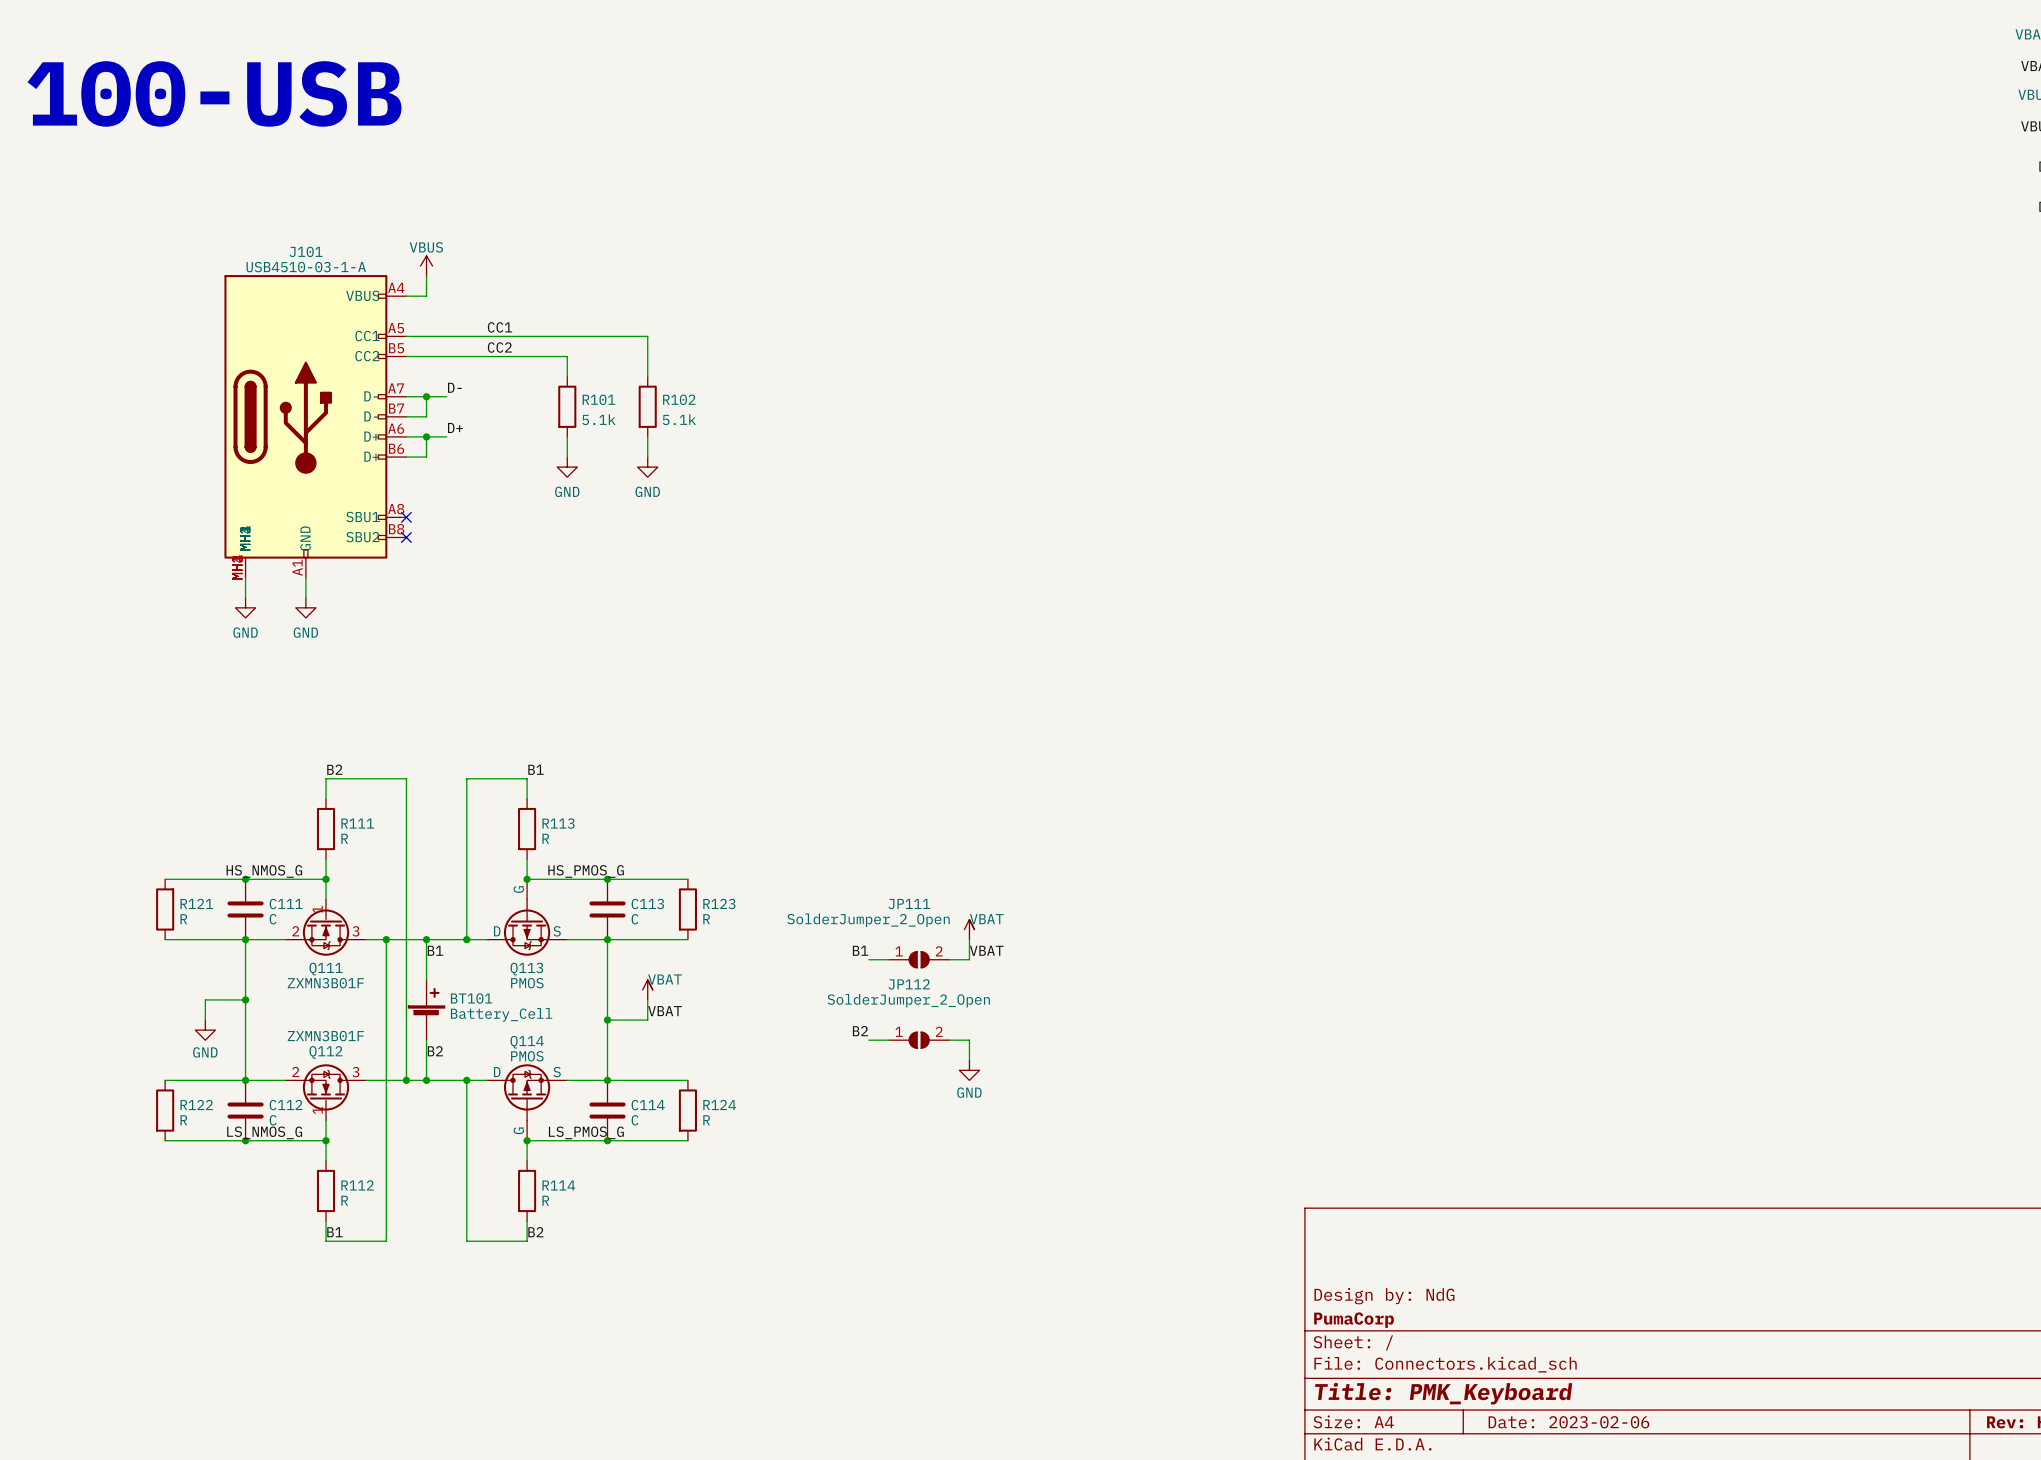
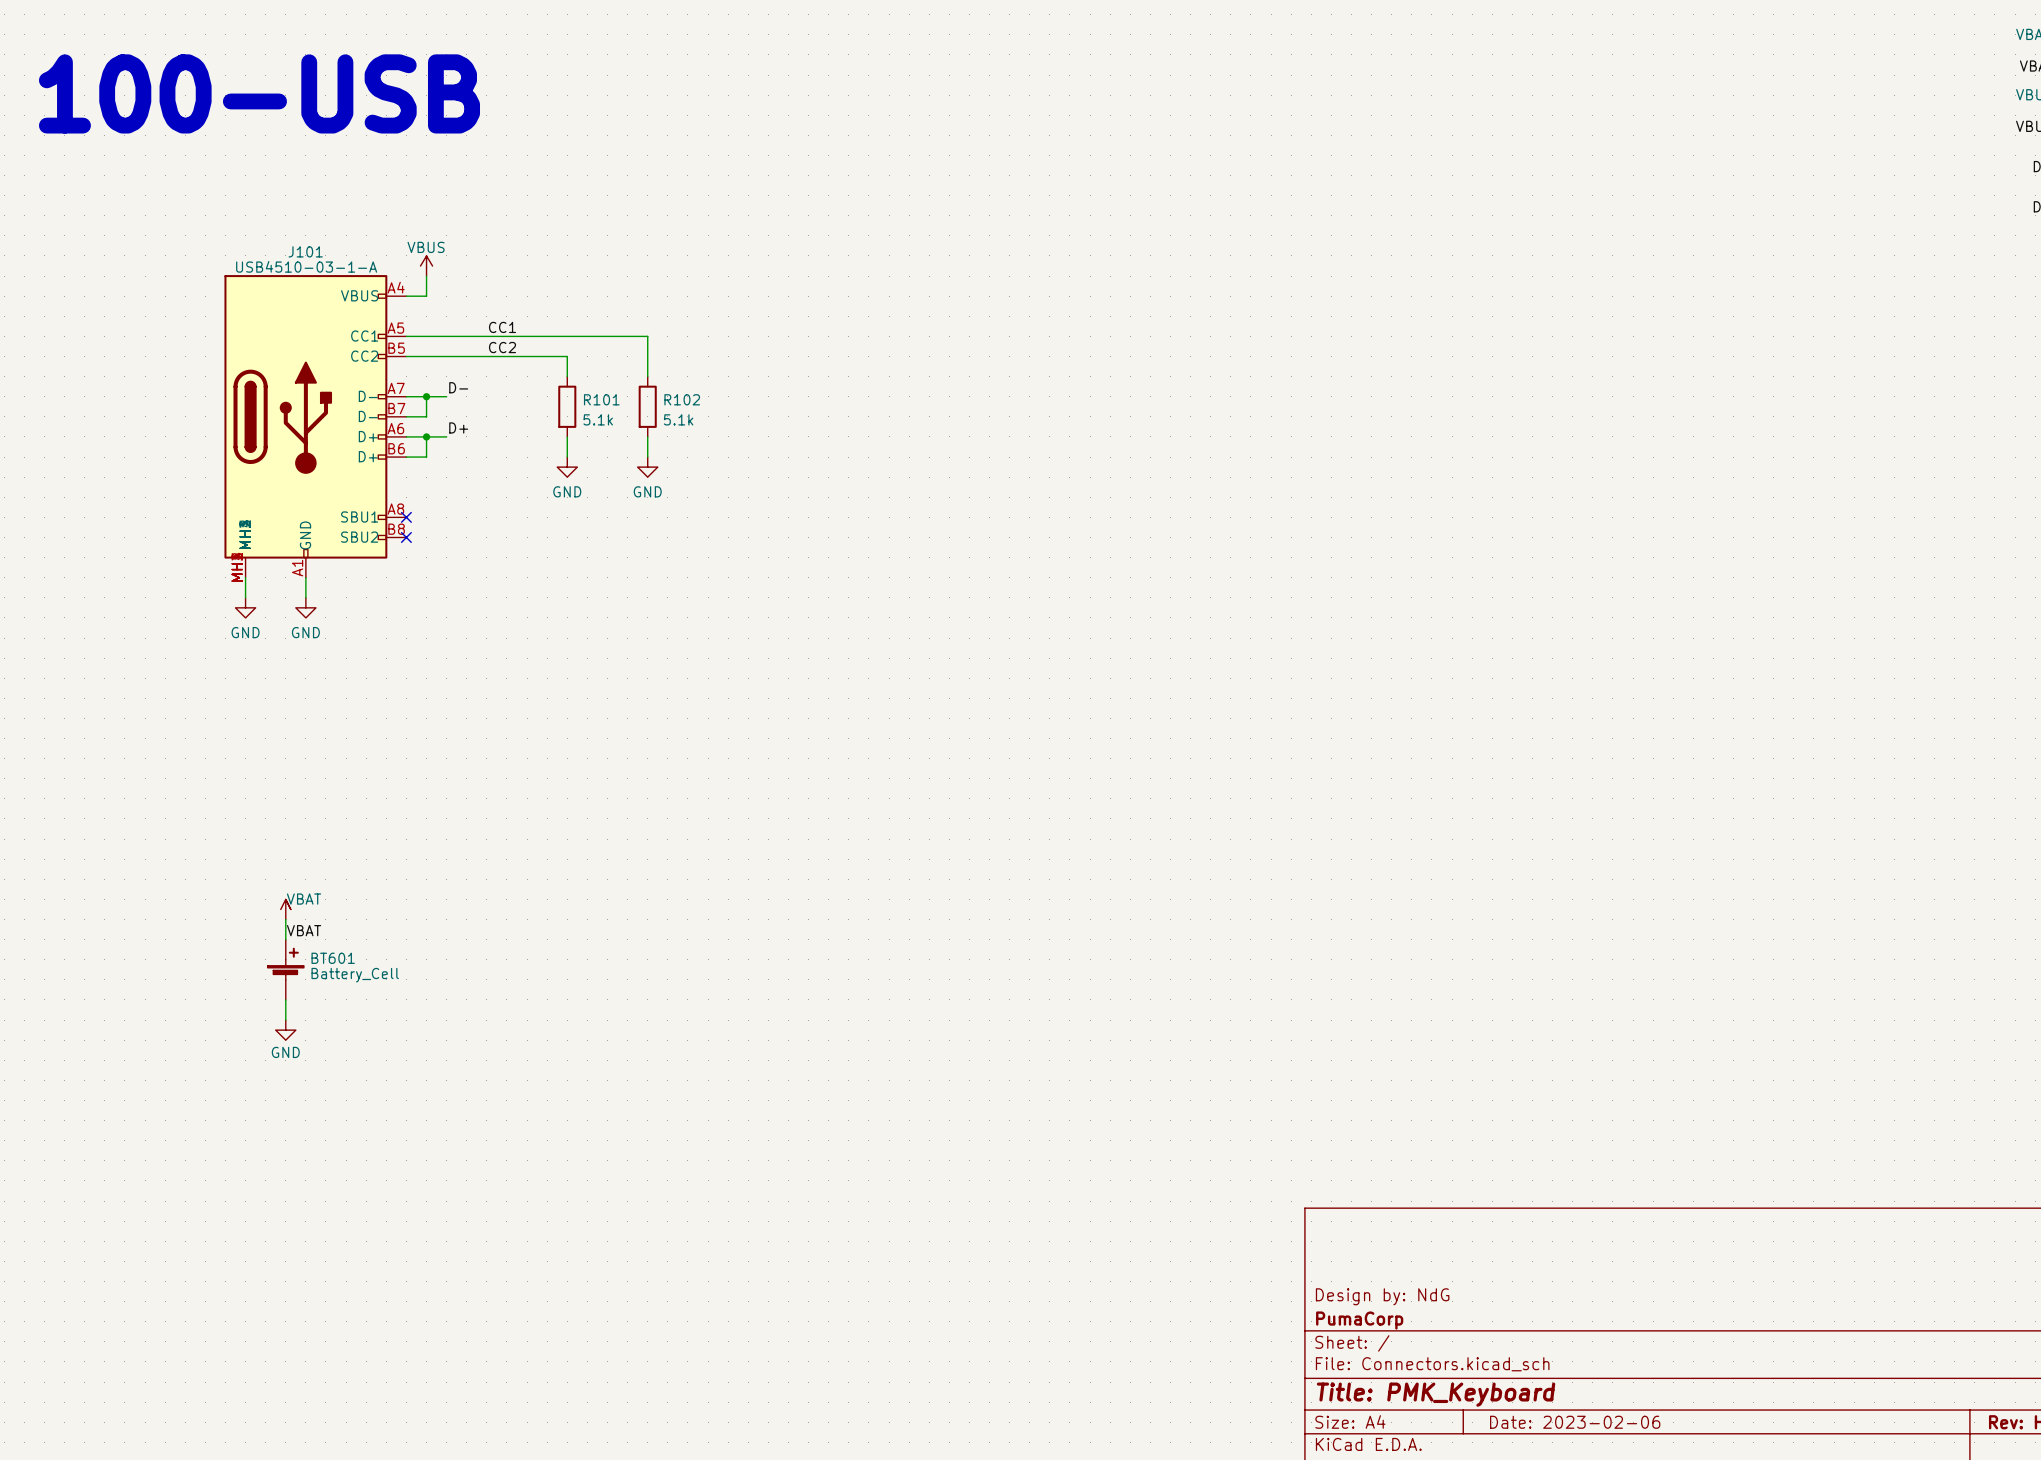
label: B2 (334, 769) -> none
label: B1 (536, 769) -> none
wire: (325, 798) (325, 778) (406, 778) (406, 1080) -> none
wire: (527, 798) (527, 778) (466, 778) (466, 939) -> none
R111: R (325, 829) -> none
R113: R (527, 829) -> none
wire: (325, 859) (325, 899) -> none
wire: (527, 859) (527, 879) (687, 879) -> none
label: HS_NMOS_G (264, 871) -> none
label: HS_PMOS_G (586, 871) -> none
wire: (165, 879) (325, 879) -> none
junction: (245, 879) -> none
junction: (325, 879) -> none
junction: (527, 879) -> none
junction: (607, 879) -> none
R121: R (165, 909) -> none
C111: C (245, 909) -> none
power symbol: none -> VBAT (285, 909)
C113: C (607, 909) -> none
R123: R (687, 909) -> none
Q113: PMOS (527, 917) -> none
Q111: ZXMN3B01F (325, 927) -> none
power symbol: VBAT (969, 929) -> none
label: none -> VBAT (304, 930)
wire: (165, 939) (285, 939) -> (285, 919) (285, 939)
wire: (245, 939) (245, 1080) -> none
junction: (245, 939) -> none
wire: (366, 939) (486, 939) -> none
wire: (386, 939) (386, 1241) (325, 1241) (325, 1221) -> none
junction: (386, 939) -> none
wire: (426, 939) (426, 979) -> none
junction: (426, 939) -> none
junction: (466, 939) -> none
wire: (567, 939) (687, 939) -> none
wire: (607, 939) (607, 1080) -> none
junction: (607, 939) -> none
wire: (969, 939) (969, 959) (949, 959) -> none
label: B1 (435, 950) -> none
label: B1 (860, 950) -> none
label: VBAT (986, 950) -> none
wire: (868, 959) (889, 959) -> none
JP111: SolderJumper_2_Open (919, 959) -> none
BT601: none -> Battery_Cell (285, 969)
power symbol: VBAT (647, 989) -> none
wire: (245, 999) (205, 999) (205, 1020) -> none
junction: (245, 999) -> none
wire: none -> (285, 999) (285, 1020)
wire: (647, 999) (647, 1020) (607, 1020) -> none
BT101: Battery_Cell (426, 1010) -> none
label: VBAT (665, 1011) -> none
junction: (607, 1020) -> none
power symbol position: GND (205, 1030) -> GND (285, 1030)
label: B2 (860, 1031) -> none
wire: (426, 1040) (426, 1080) -> none
wire: (868, 1040) (889, 1040) -> none
JP112: SolderJumper_2_Open (919, 1040) -> none
wire: (949, 1040) (969, 1040) (969, 1060) -> none
label: B2 (435, 1051) -> none
power symbol: GND (969, 1070) -> none
wire: (165, 1080) (285, 1080) -> none
junction: (245, 1080) -> none
wire: (366, 1080) (486, 1080) -> none
junction: (406, 1080) -> none
junction: (426, 1080) -> none
wire: (466, 1080) (466, 1241) (527, 1241) (527, 1221) -> none
junction: (466, 1080) -> none
wire: (567, 1080) (687, 1080) -> none
junction: (607, 1080) -> none
Q112: ZXMN3B01F (325, 1092) -> none
Q114: PMOS (527, 1102) -> none
R122: R (165, 1110) -> none
C112: C (245, 1110) -> none
C114: C (607, 1110) -> none
R124: R (687, 1110) -> none
wire: (325, 1120) (325, 1160) -> none
label: LS_NMOS_G (264, 1132) -> none
label: LS_PMOS_G (586, 1132) -> none
wire: (165, 1140) (325, 1140) -> none
junction: (245, 1140) -> none
junction: (325, 1140) -> none
junction: (527, 1140) -> none
junction: (607, 1140) -> none
wire: (687, 1140) (527, 1140) (527, 1160) -> none
R112: R (325, 1190) -> none
R114: R (527, 1190) -> none
label: B1 (334, 1232) -> none
label: B2 (535, 1232) -> none

